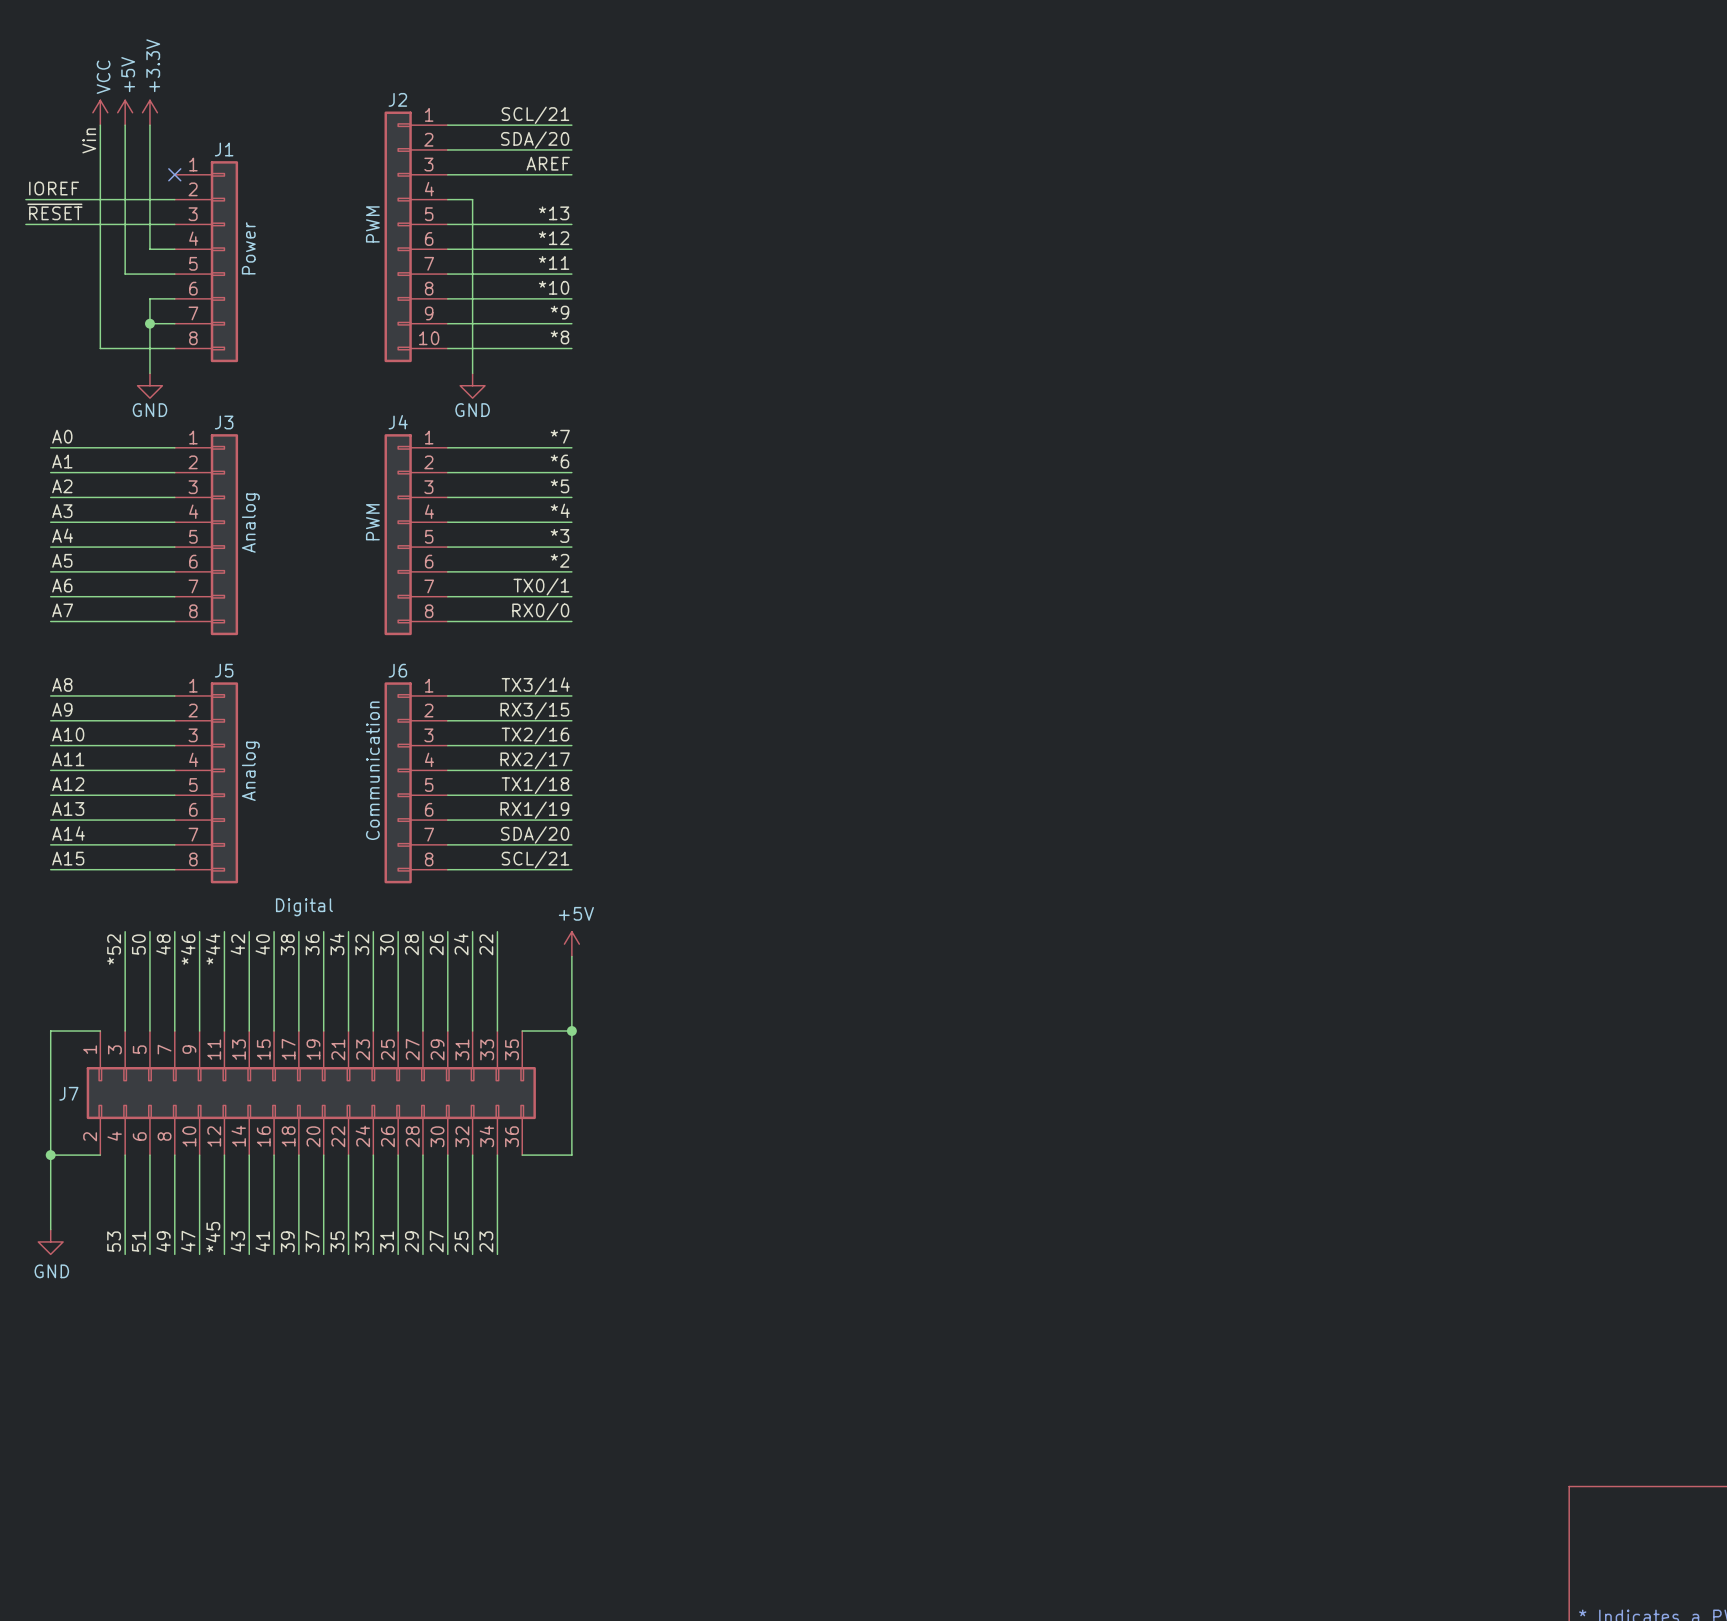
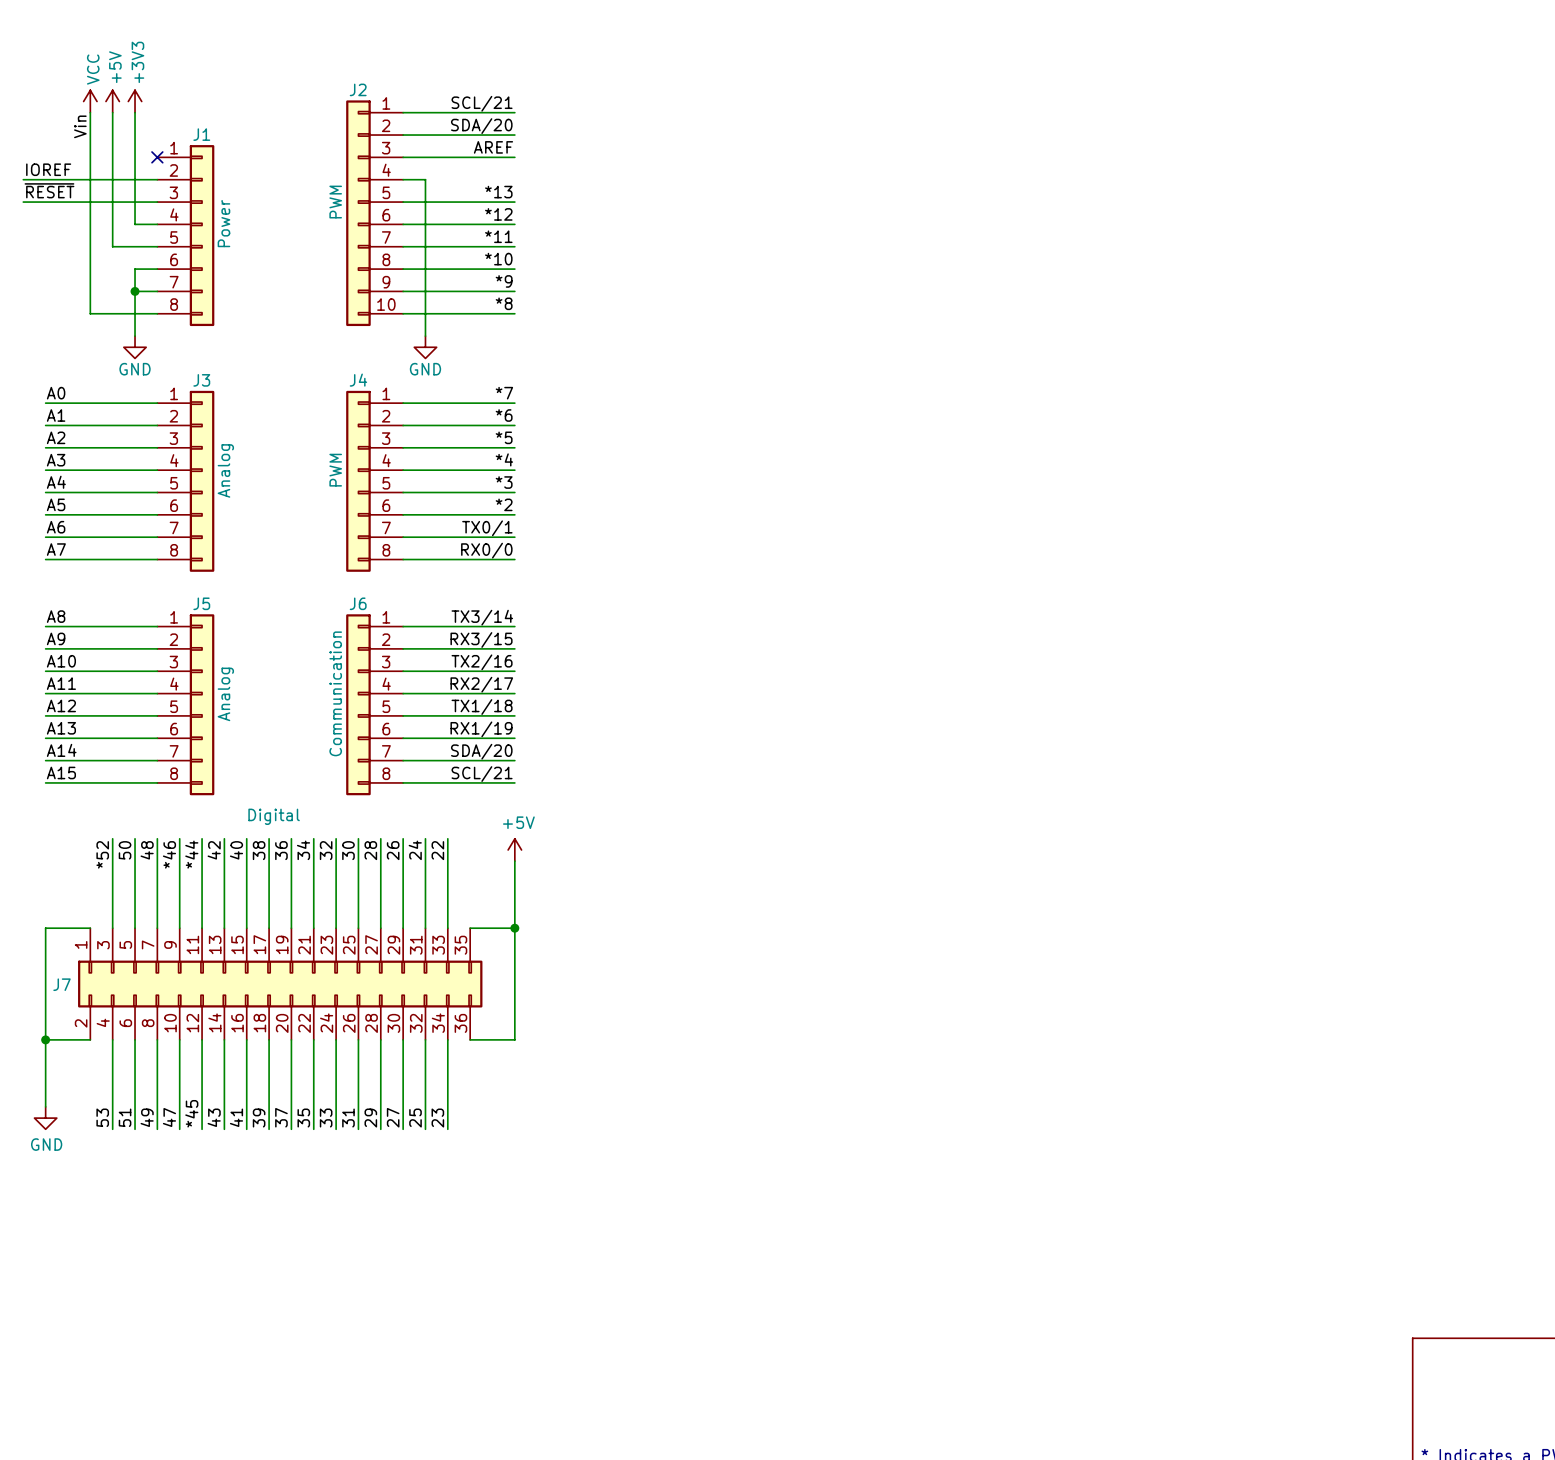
power symbol: +3.3V (149, 112) -> +3V3 (135, 101)

